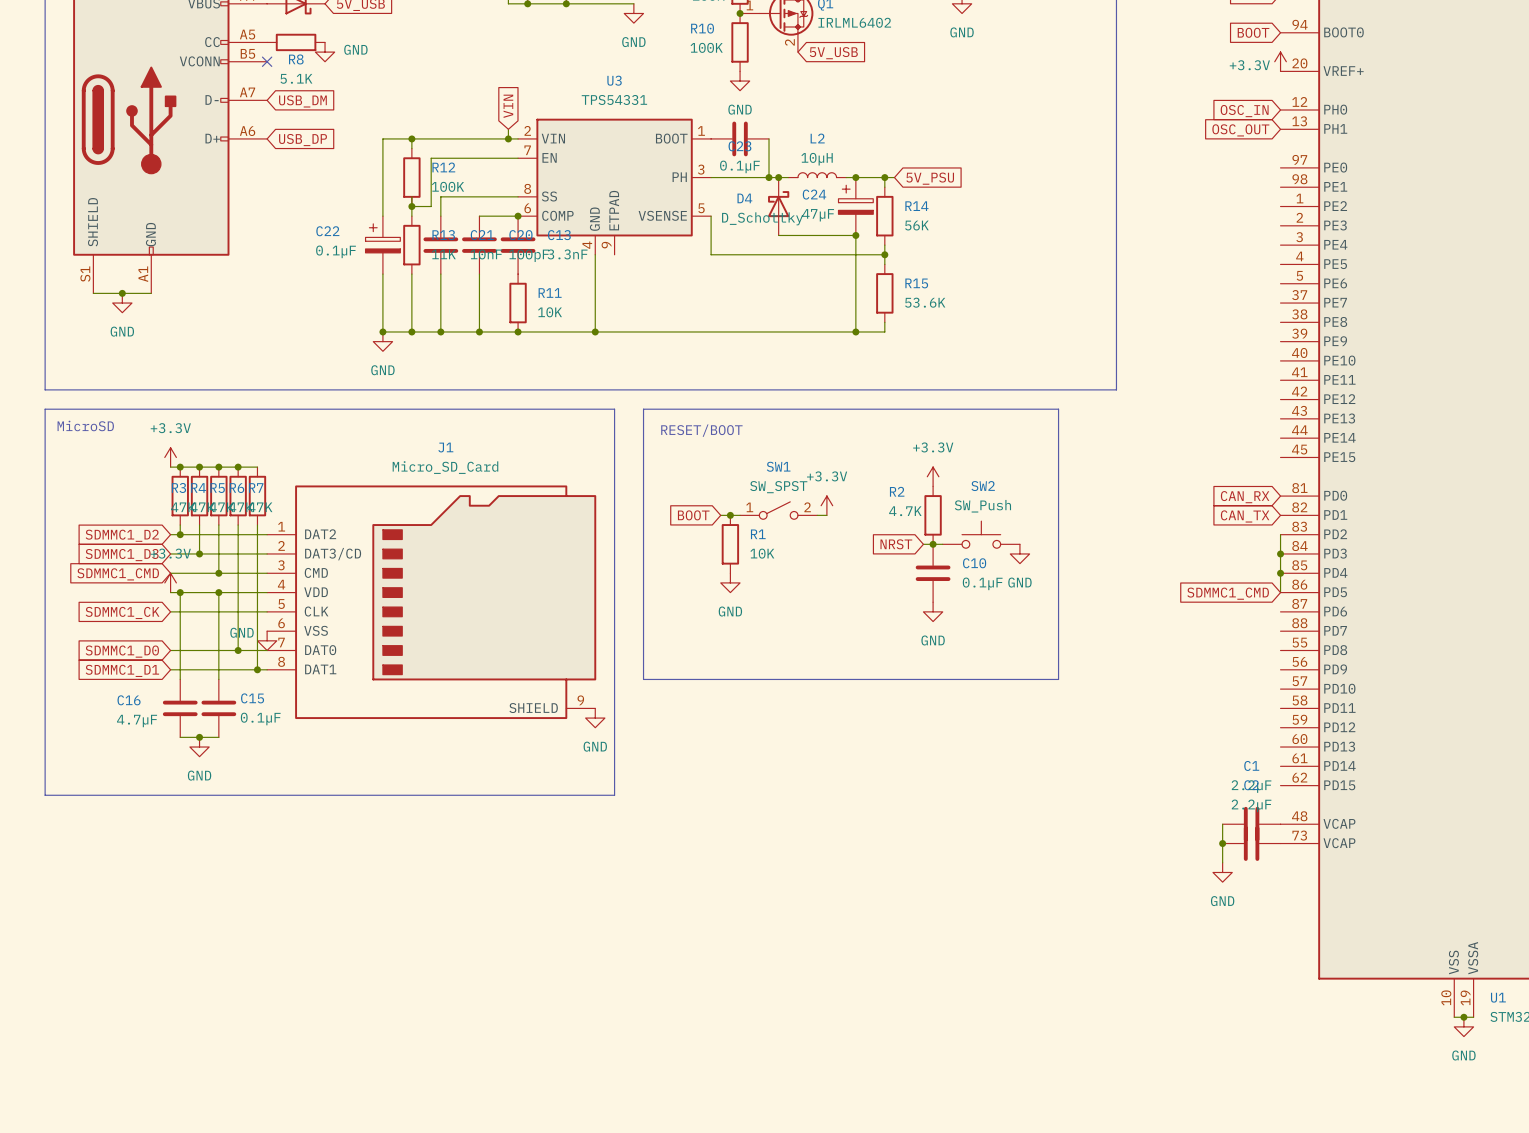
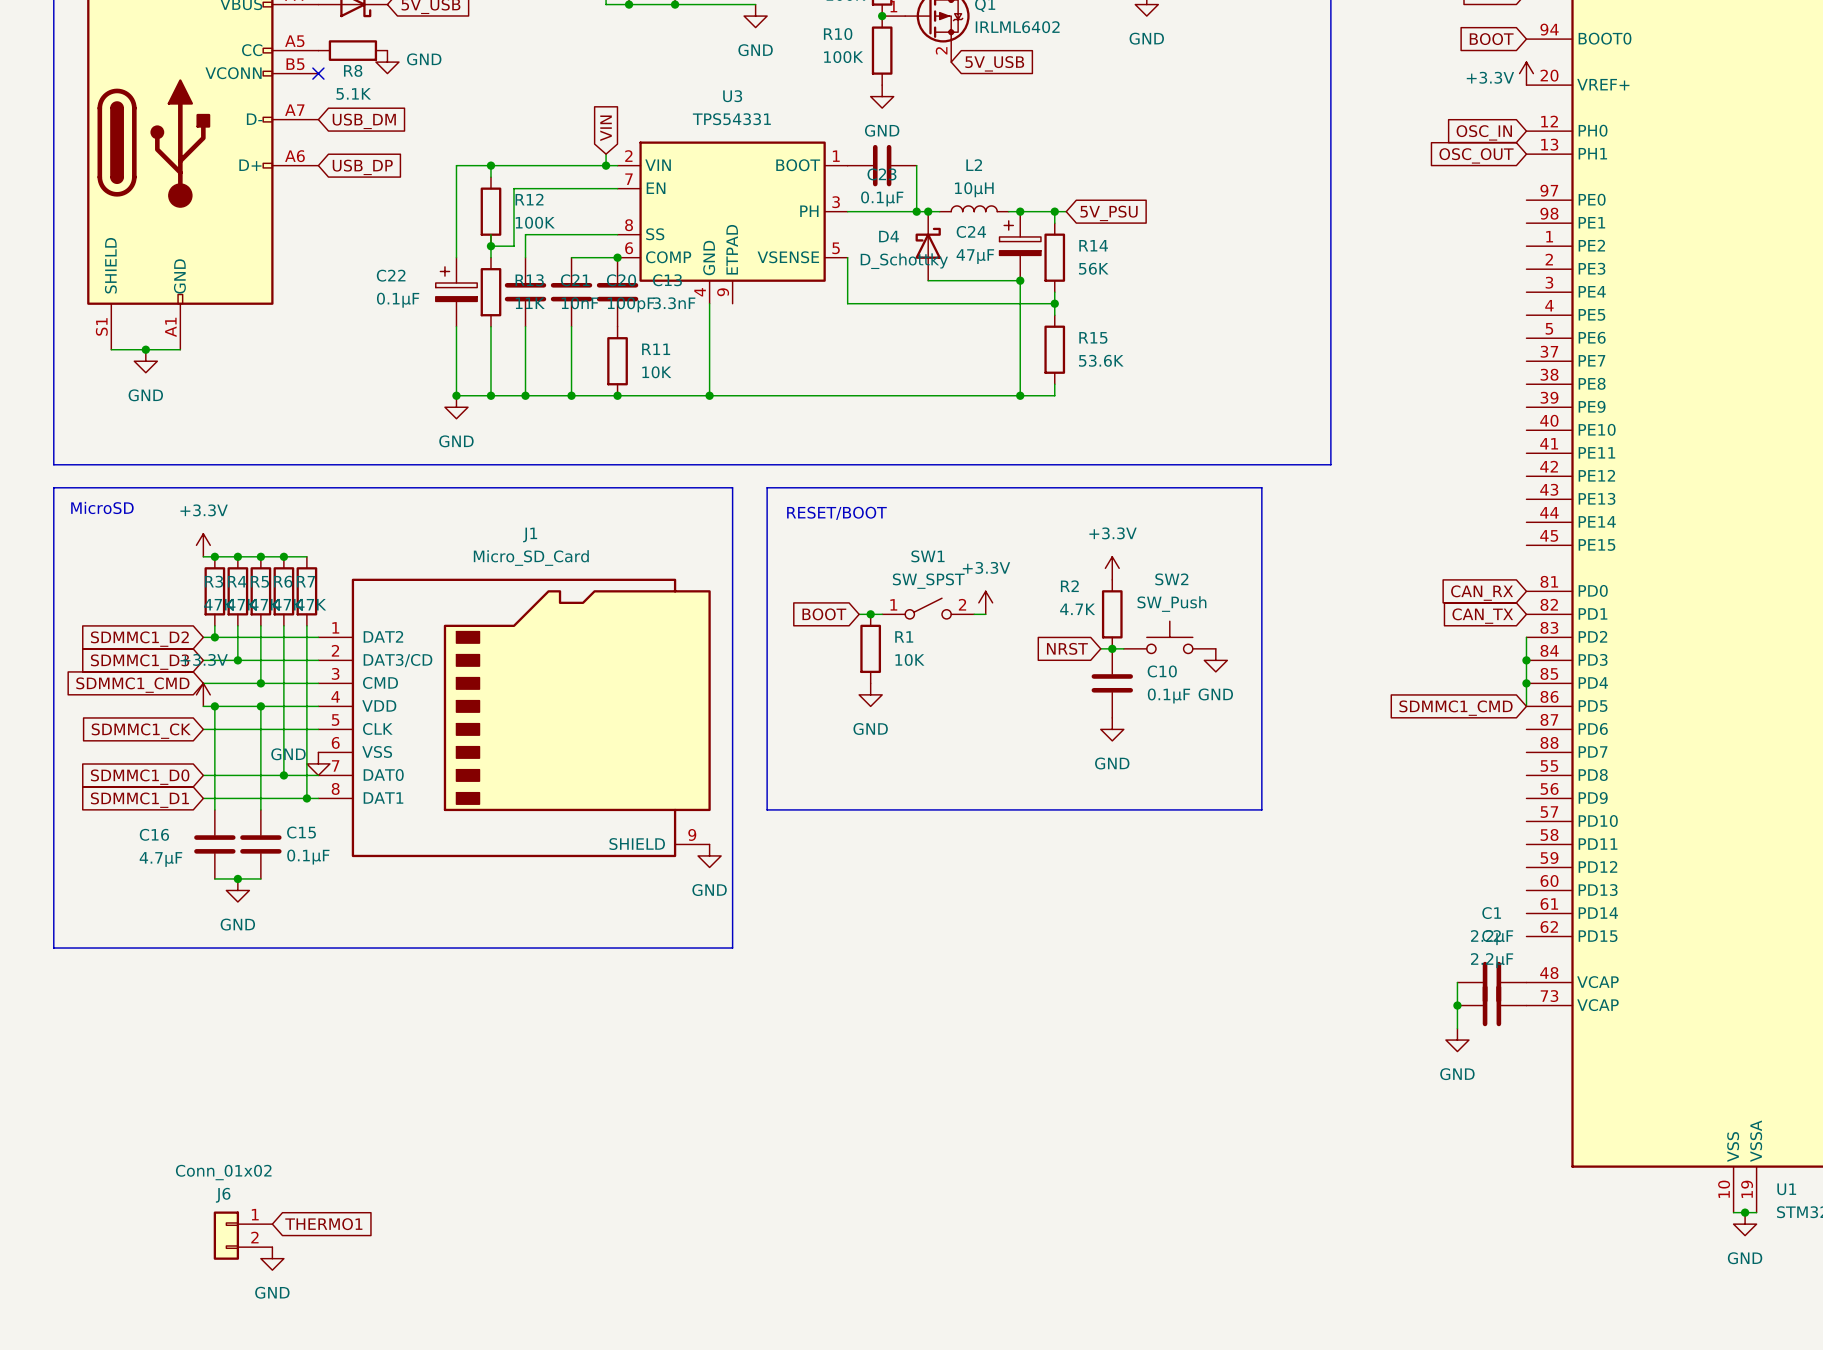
global label: none -> THERMO1 (323, 1224)
J6: none -> Conn_01x02 (243, 1235)
power symbol: none -> GND (272, 1258)

